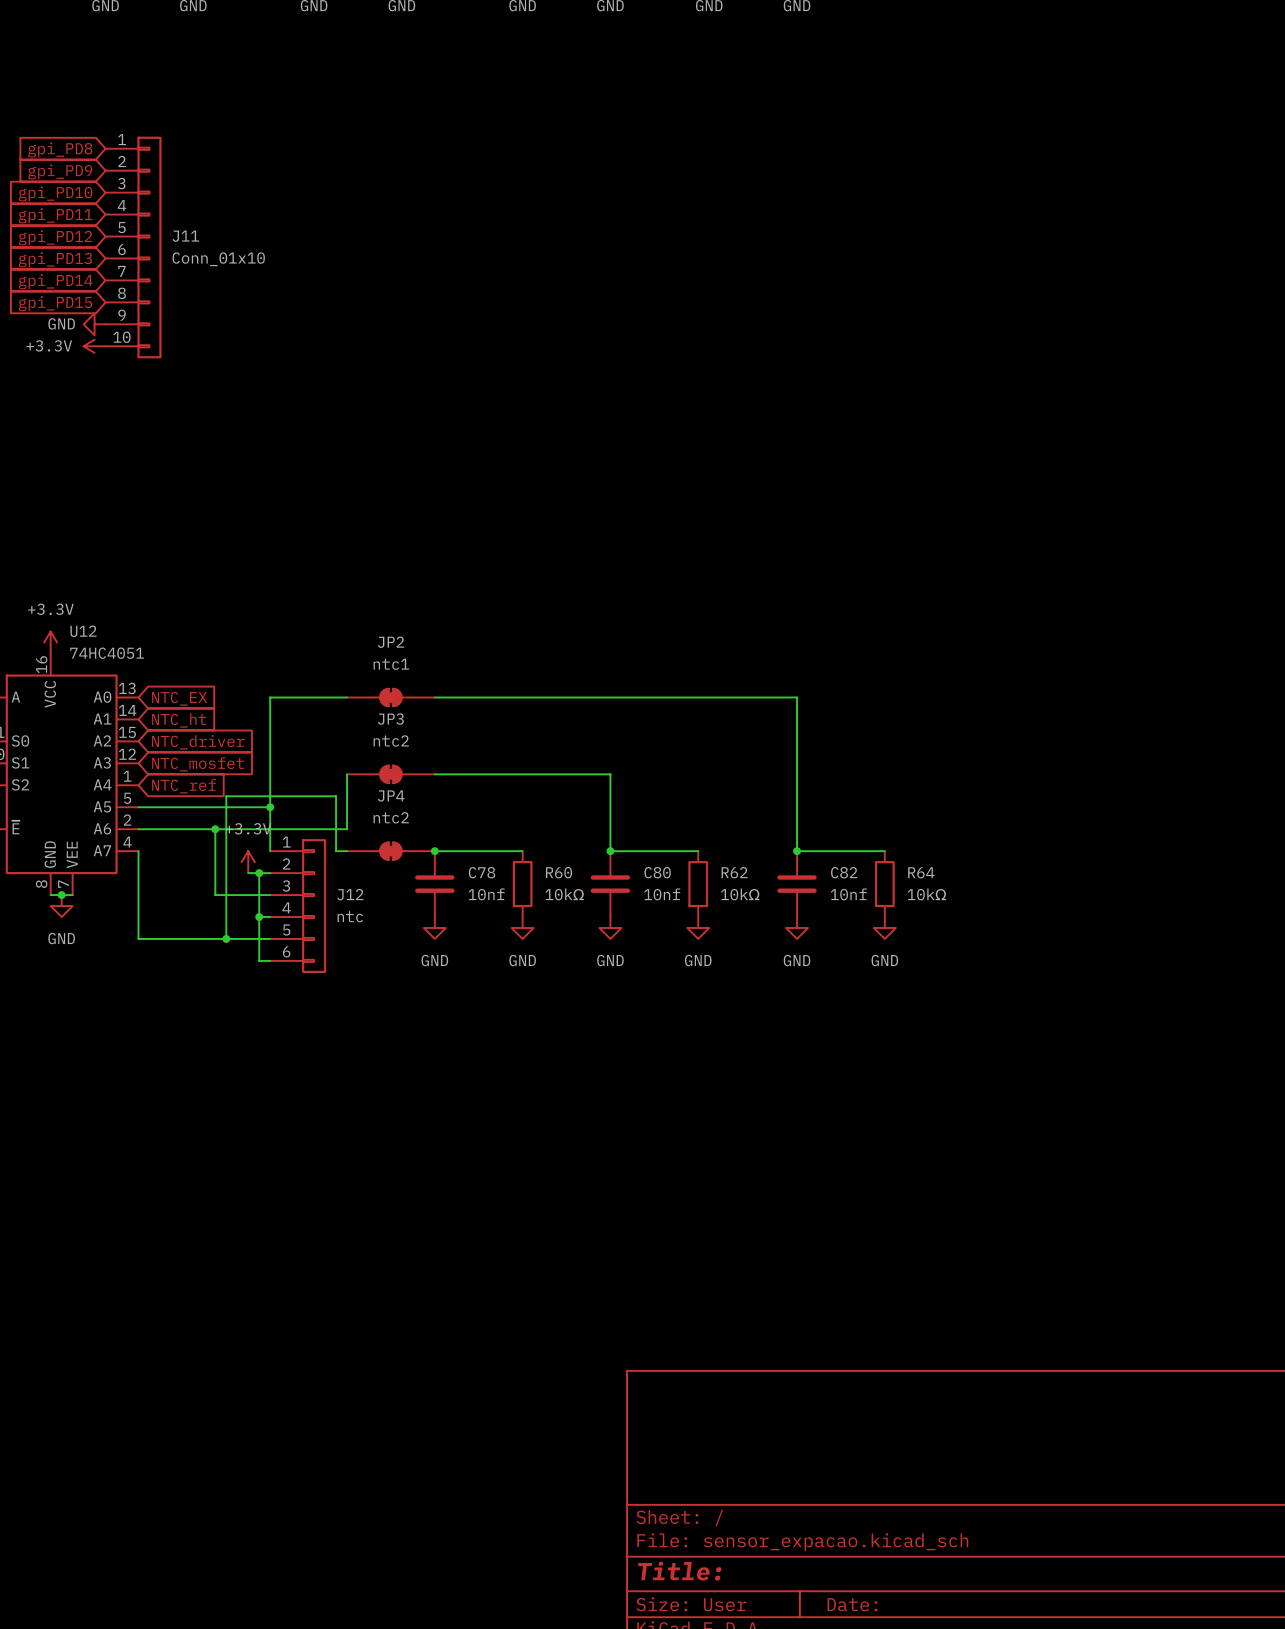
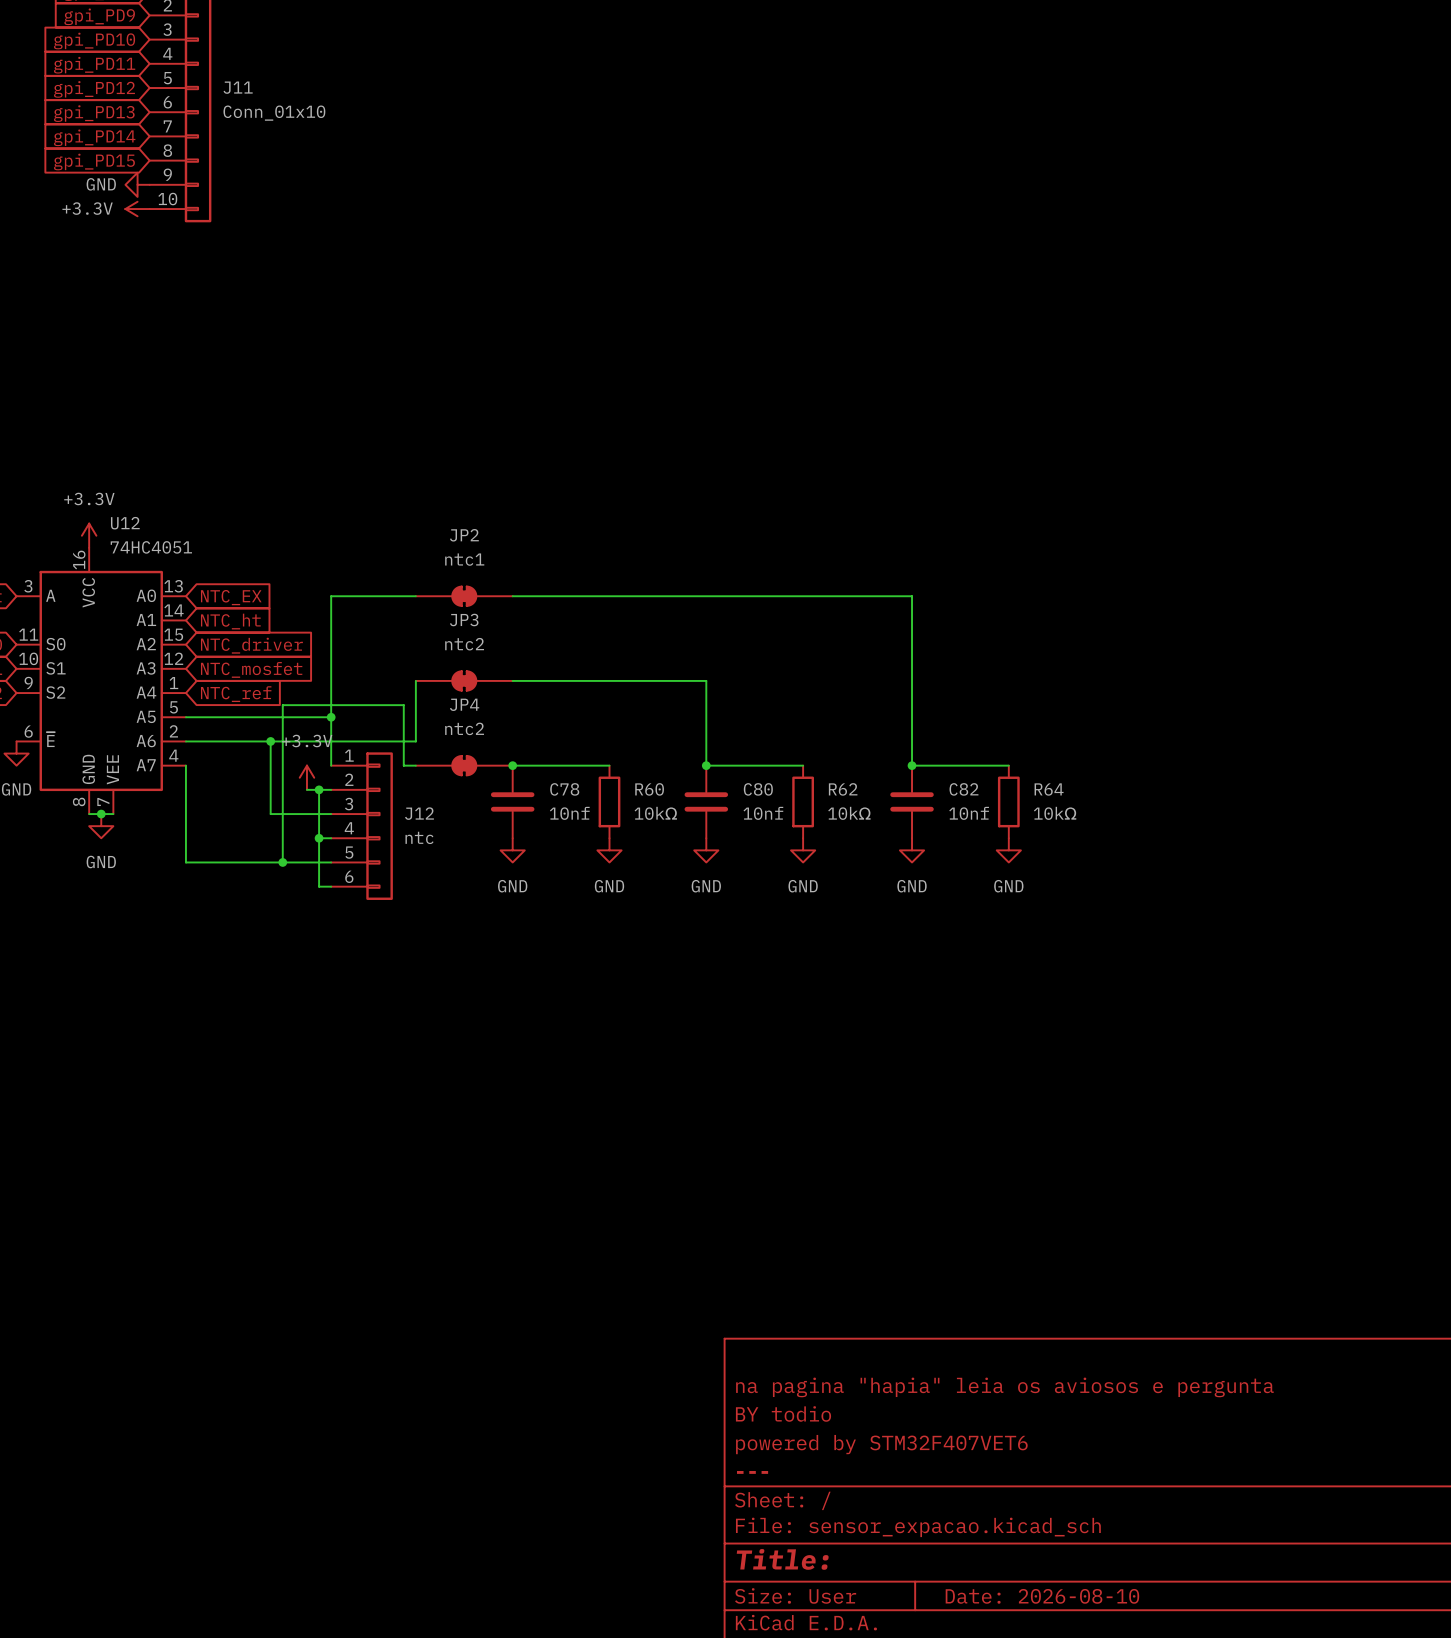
title block: none -> na pagina "hapia" leia os aviosos e pergunta (1004, 1387)
title block: none -> BY todio (783, 1413)
title block: none -> powered by STM32F407VET6 (881, 1444)
title block: none -> --- (752, 1472)
title block: Date: (852, 1604) -> Date: 2026-08-10 (1042, 1596)

